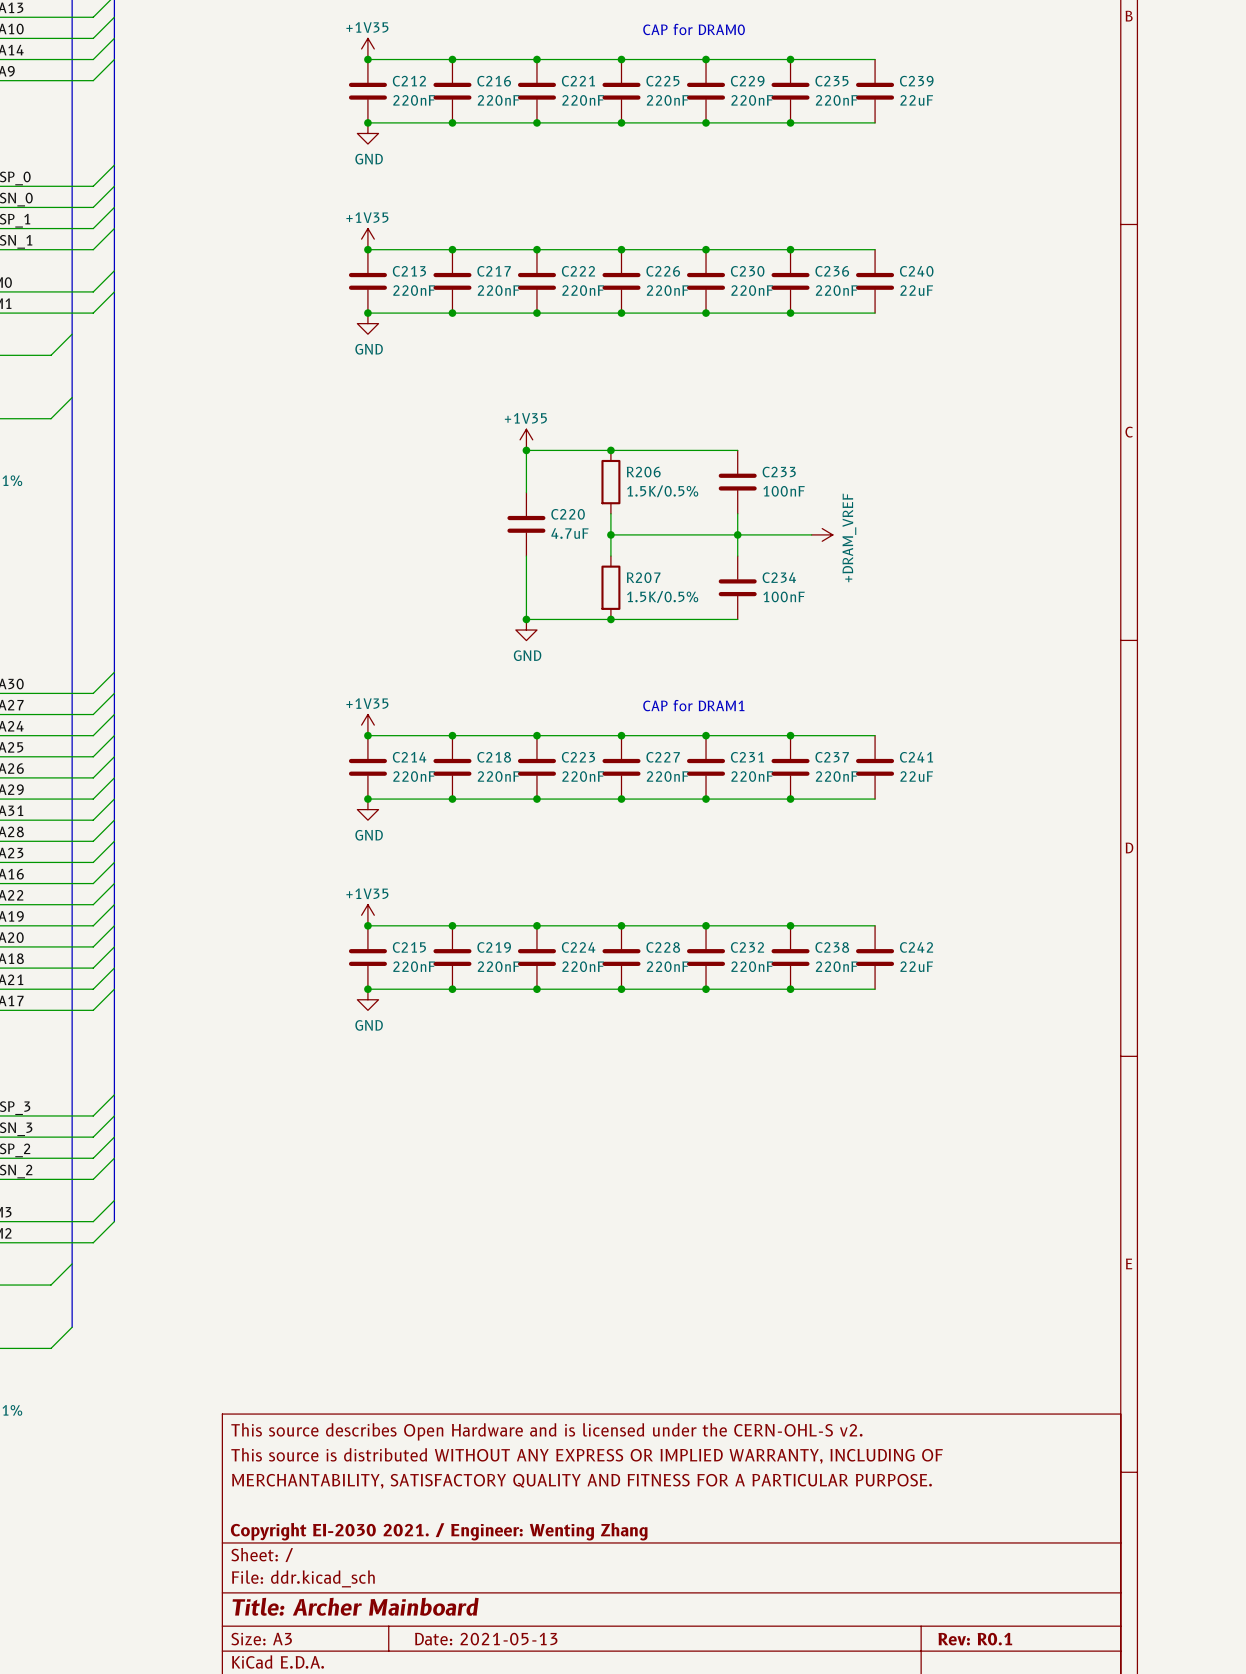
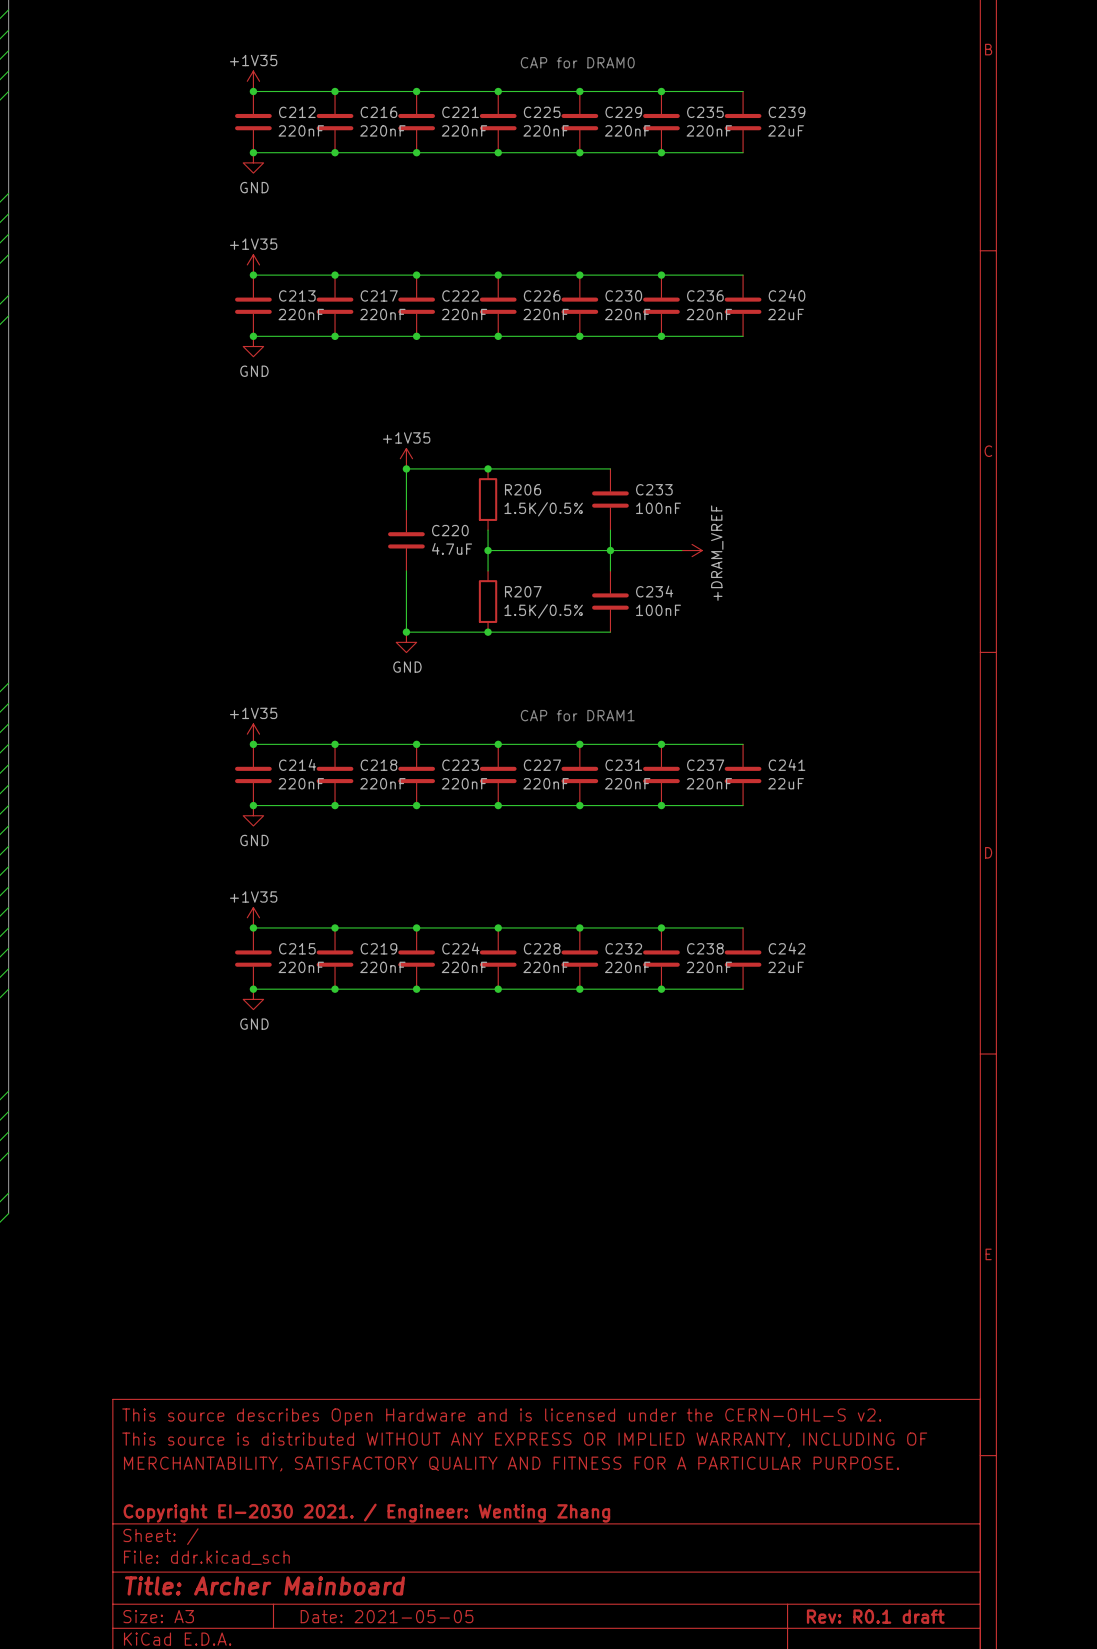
title block: Date: 2021-05-13 (486, 1639) -> Date: 2021-05-05 (387, 1616)
title block: Rev: R0.1 (975, 1639) -> Rev: R0.1 draft (875, 1616)

